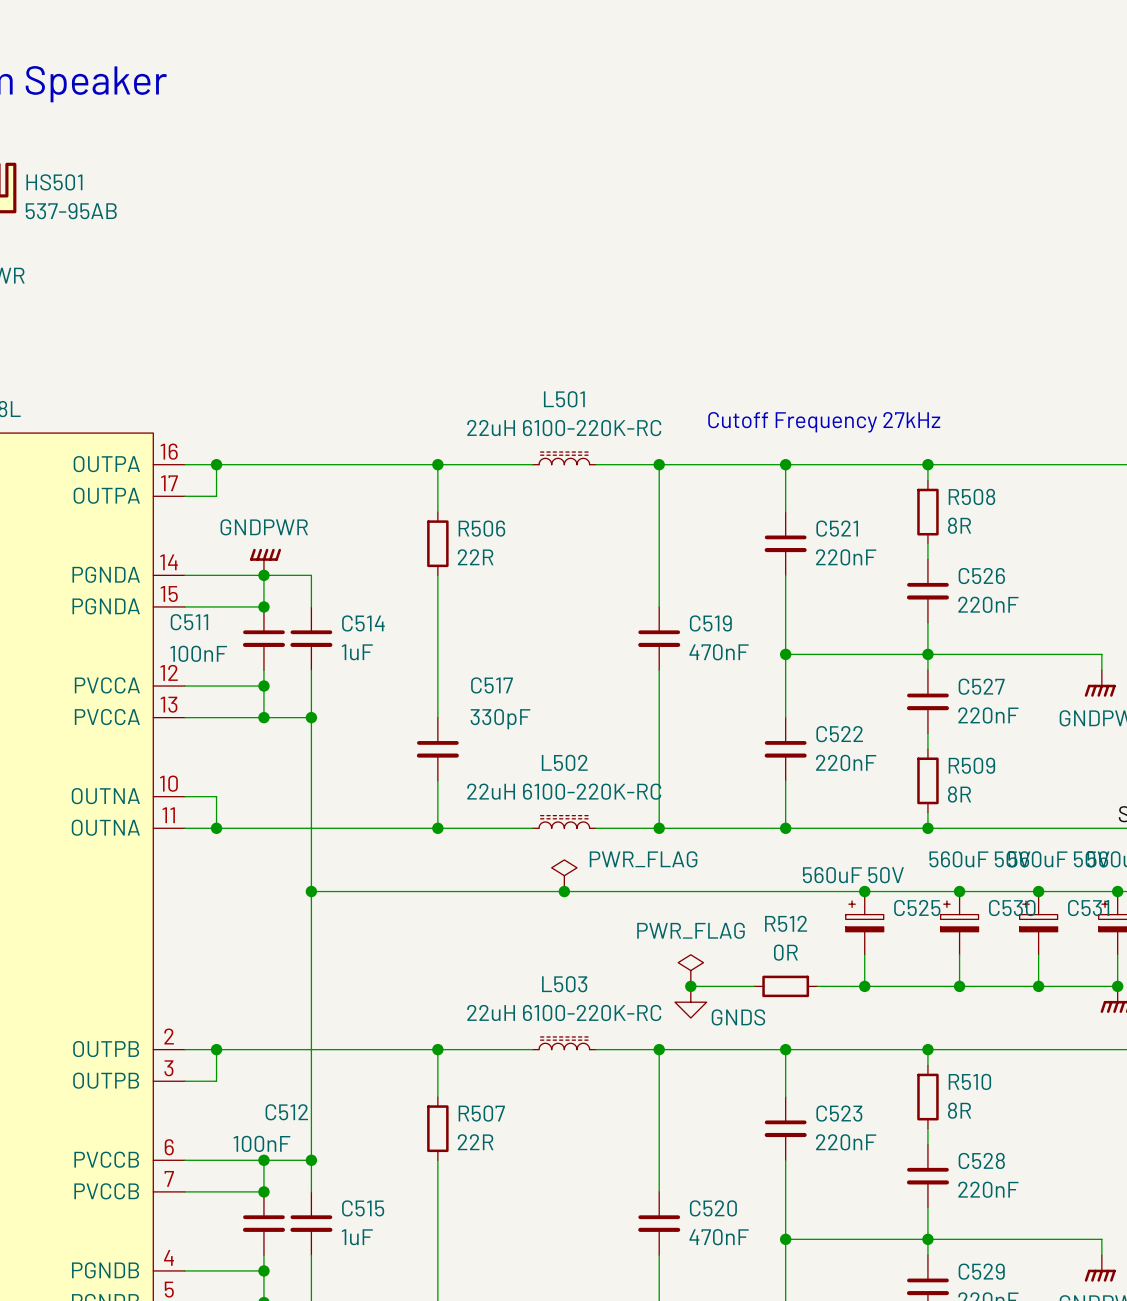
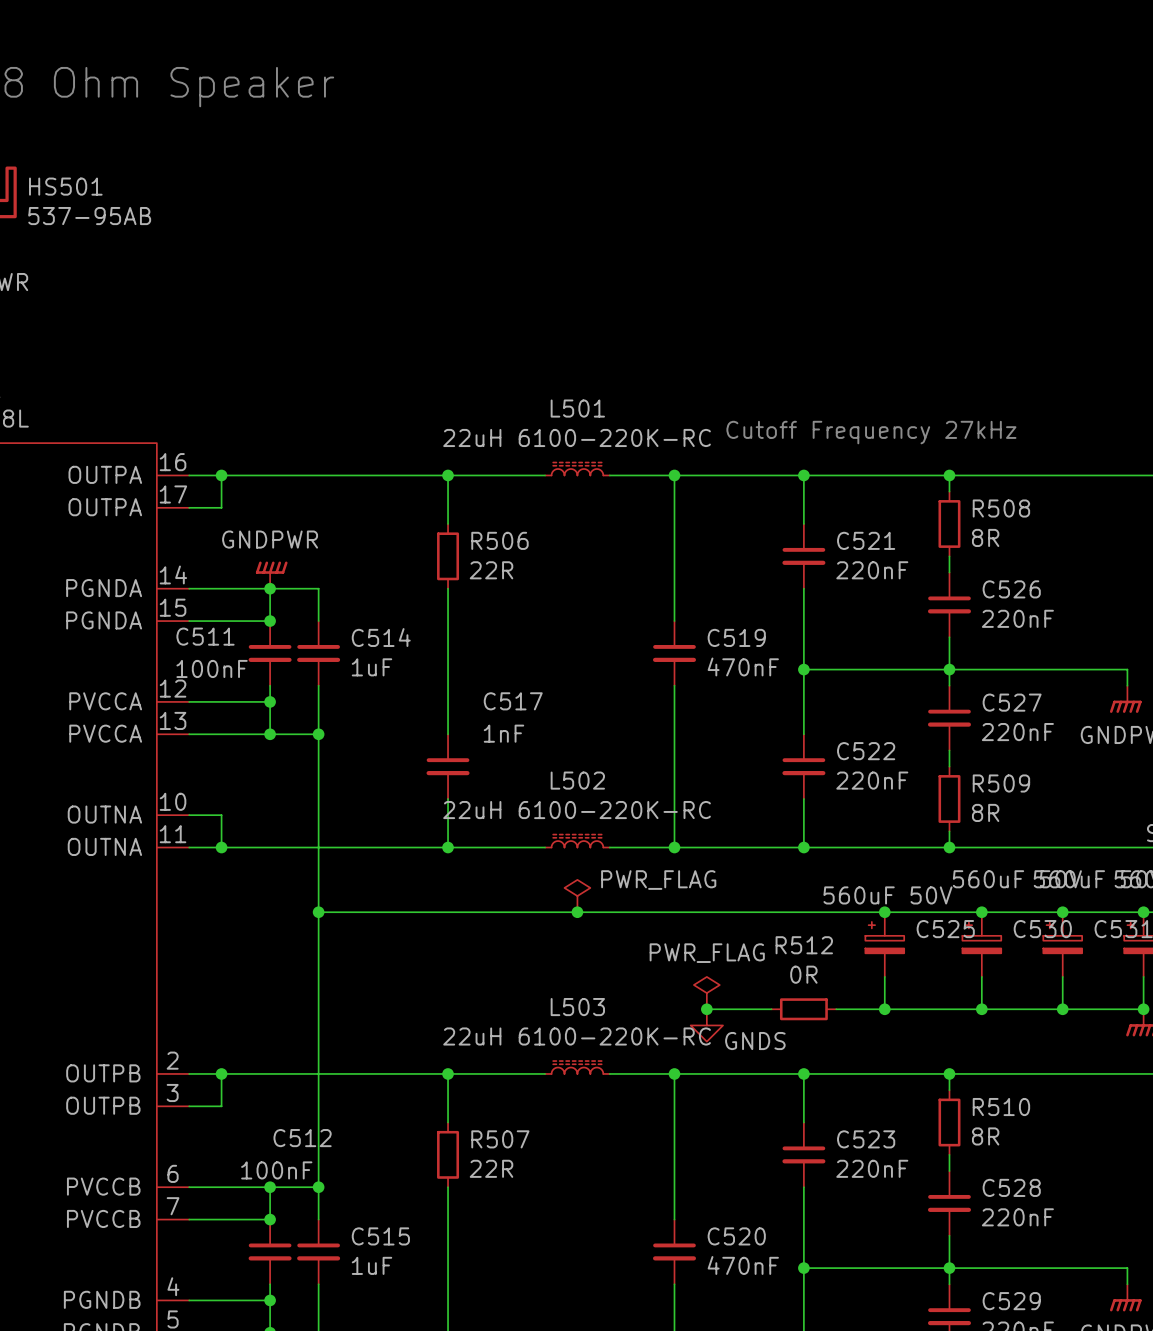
C517 value: 330pF (500, 719) -> 1nF (503, 733)

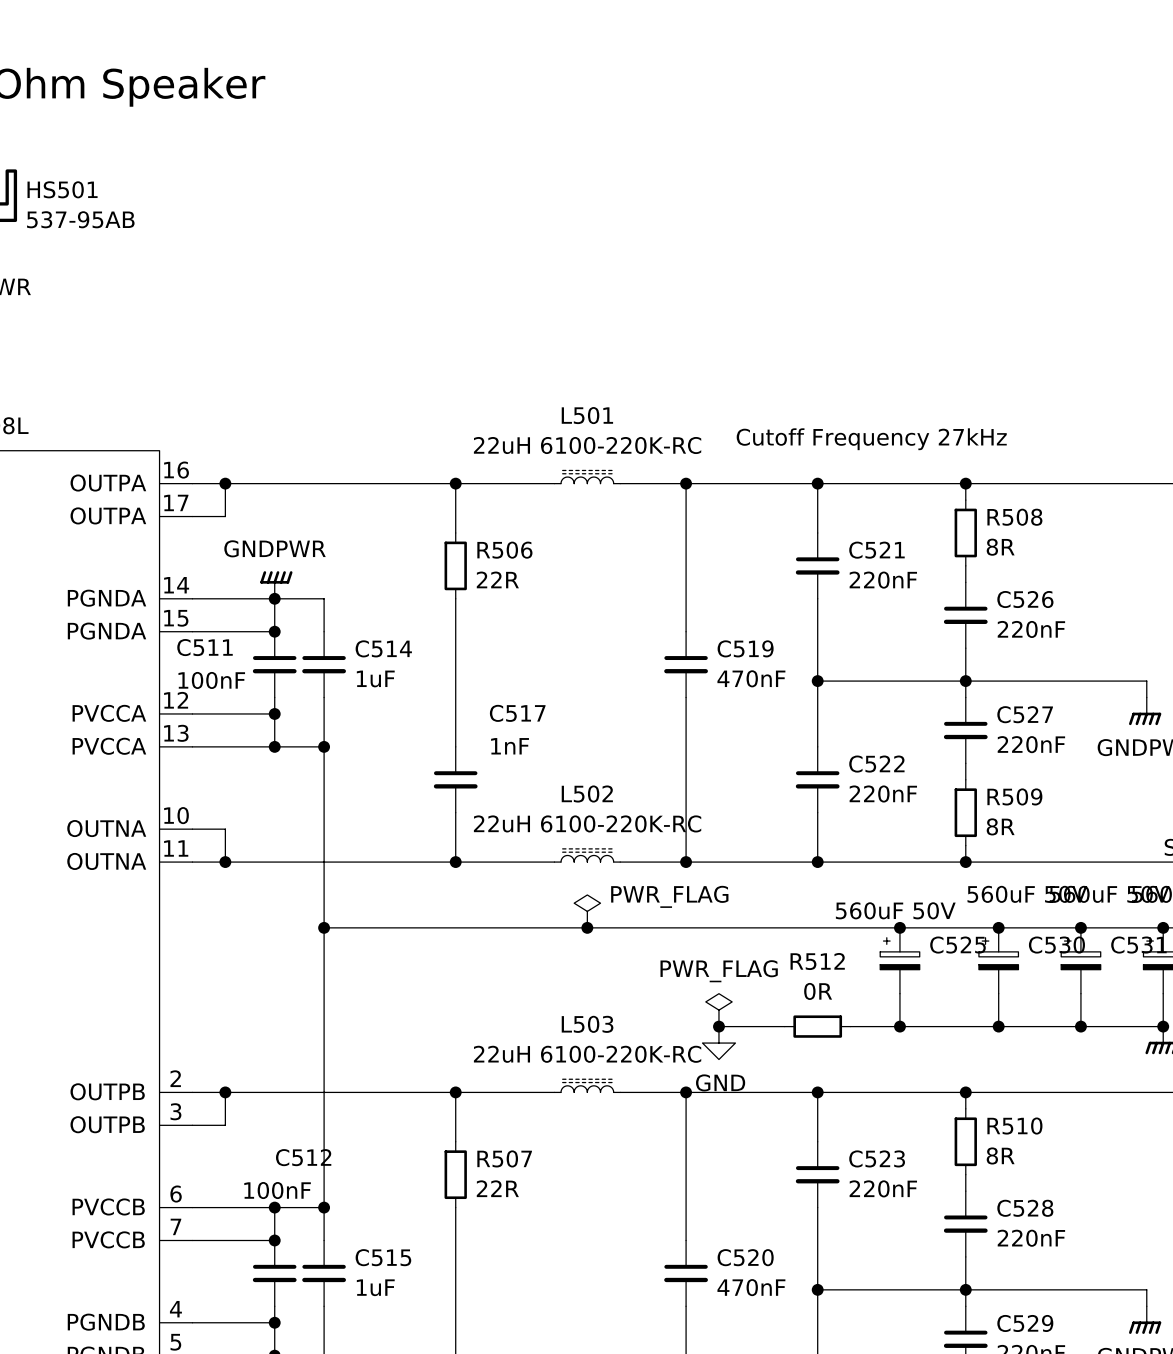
power symbol: GNDS (706, 1025) -> GND (718, 1043)

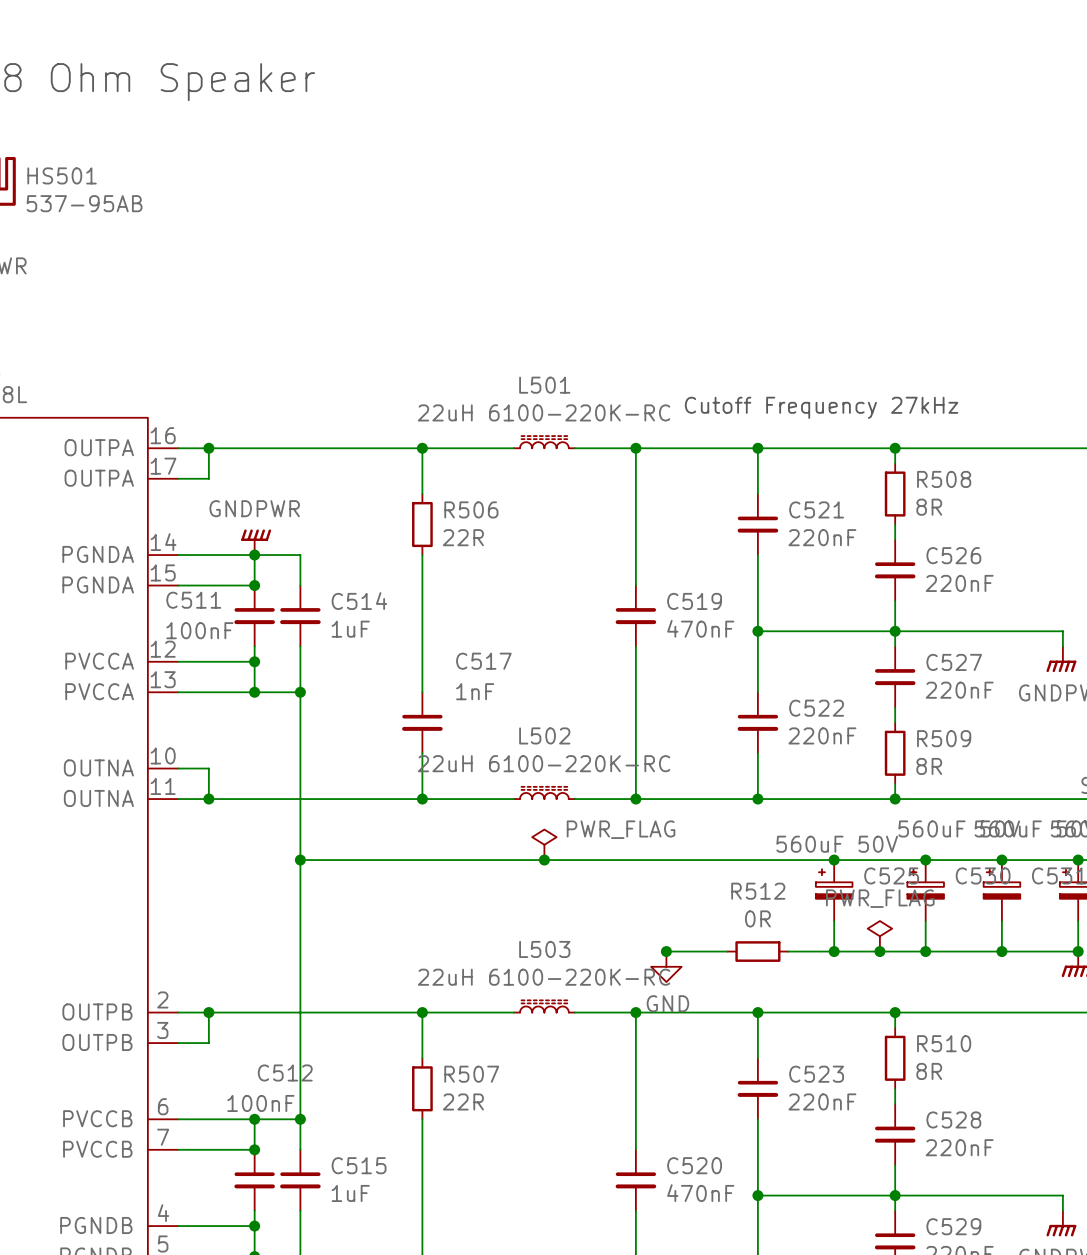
power symbol position: PWR_FLAG (718, 1010) -> PWR_FLAG (879, 936)
junction: none -> (879, 951)

